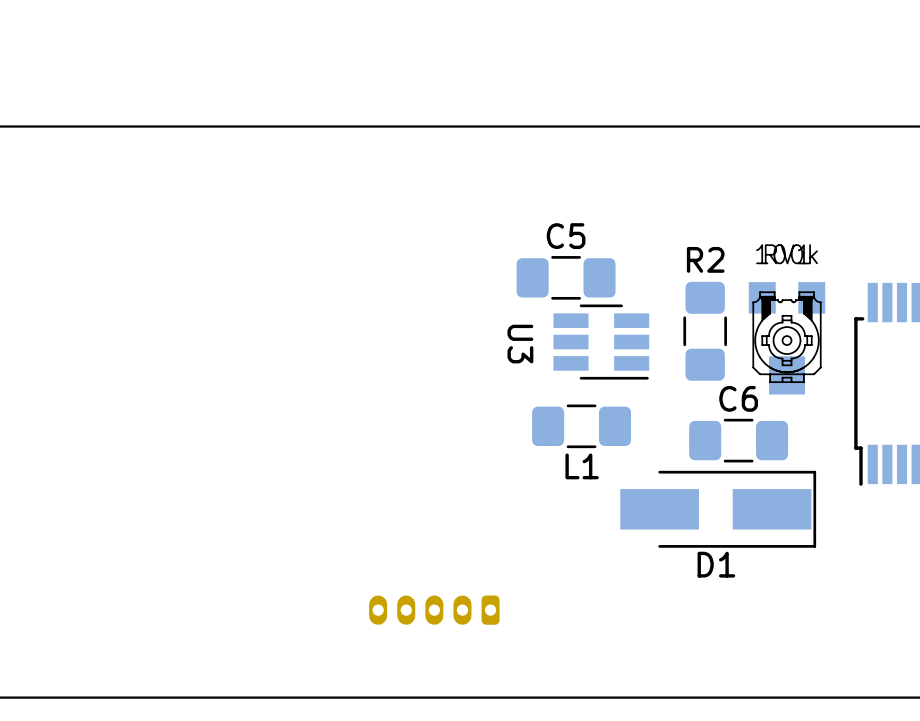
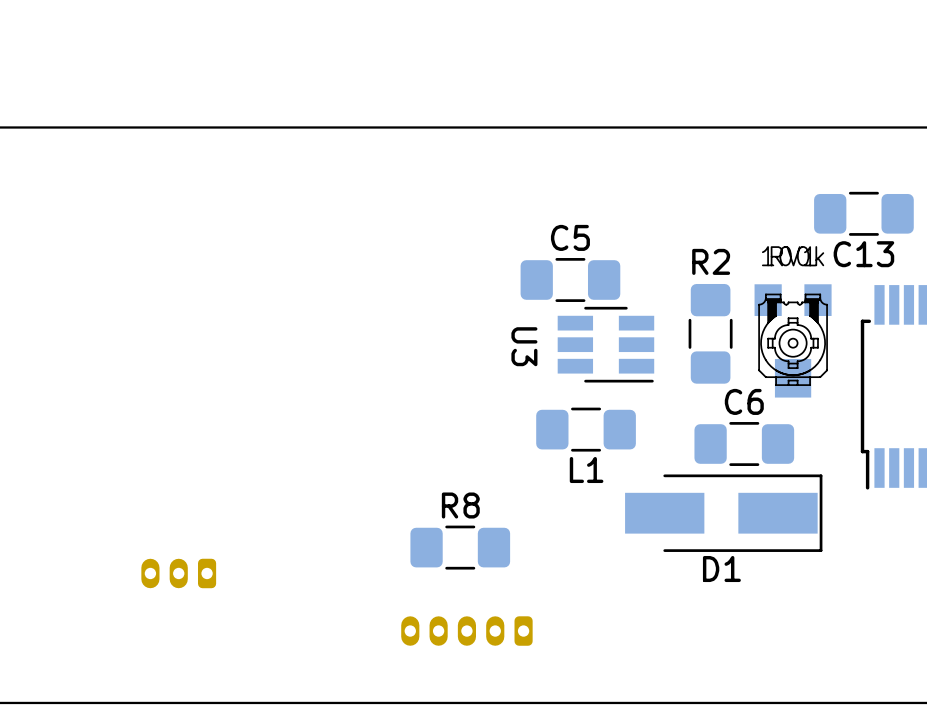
C13: none -> (863, 213)
R8: none -> (460, 547)
part: none -> (178, 573)
part position: (434, 610) -> (466, 631)

